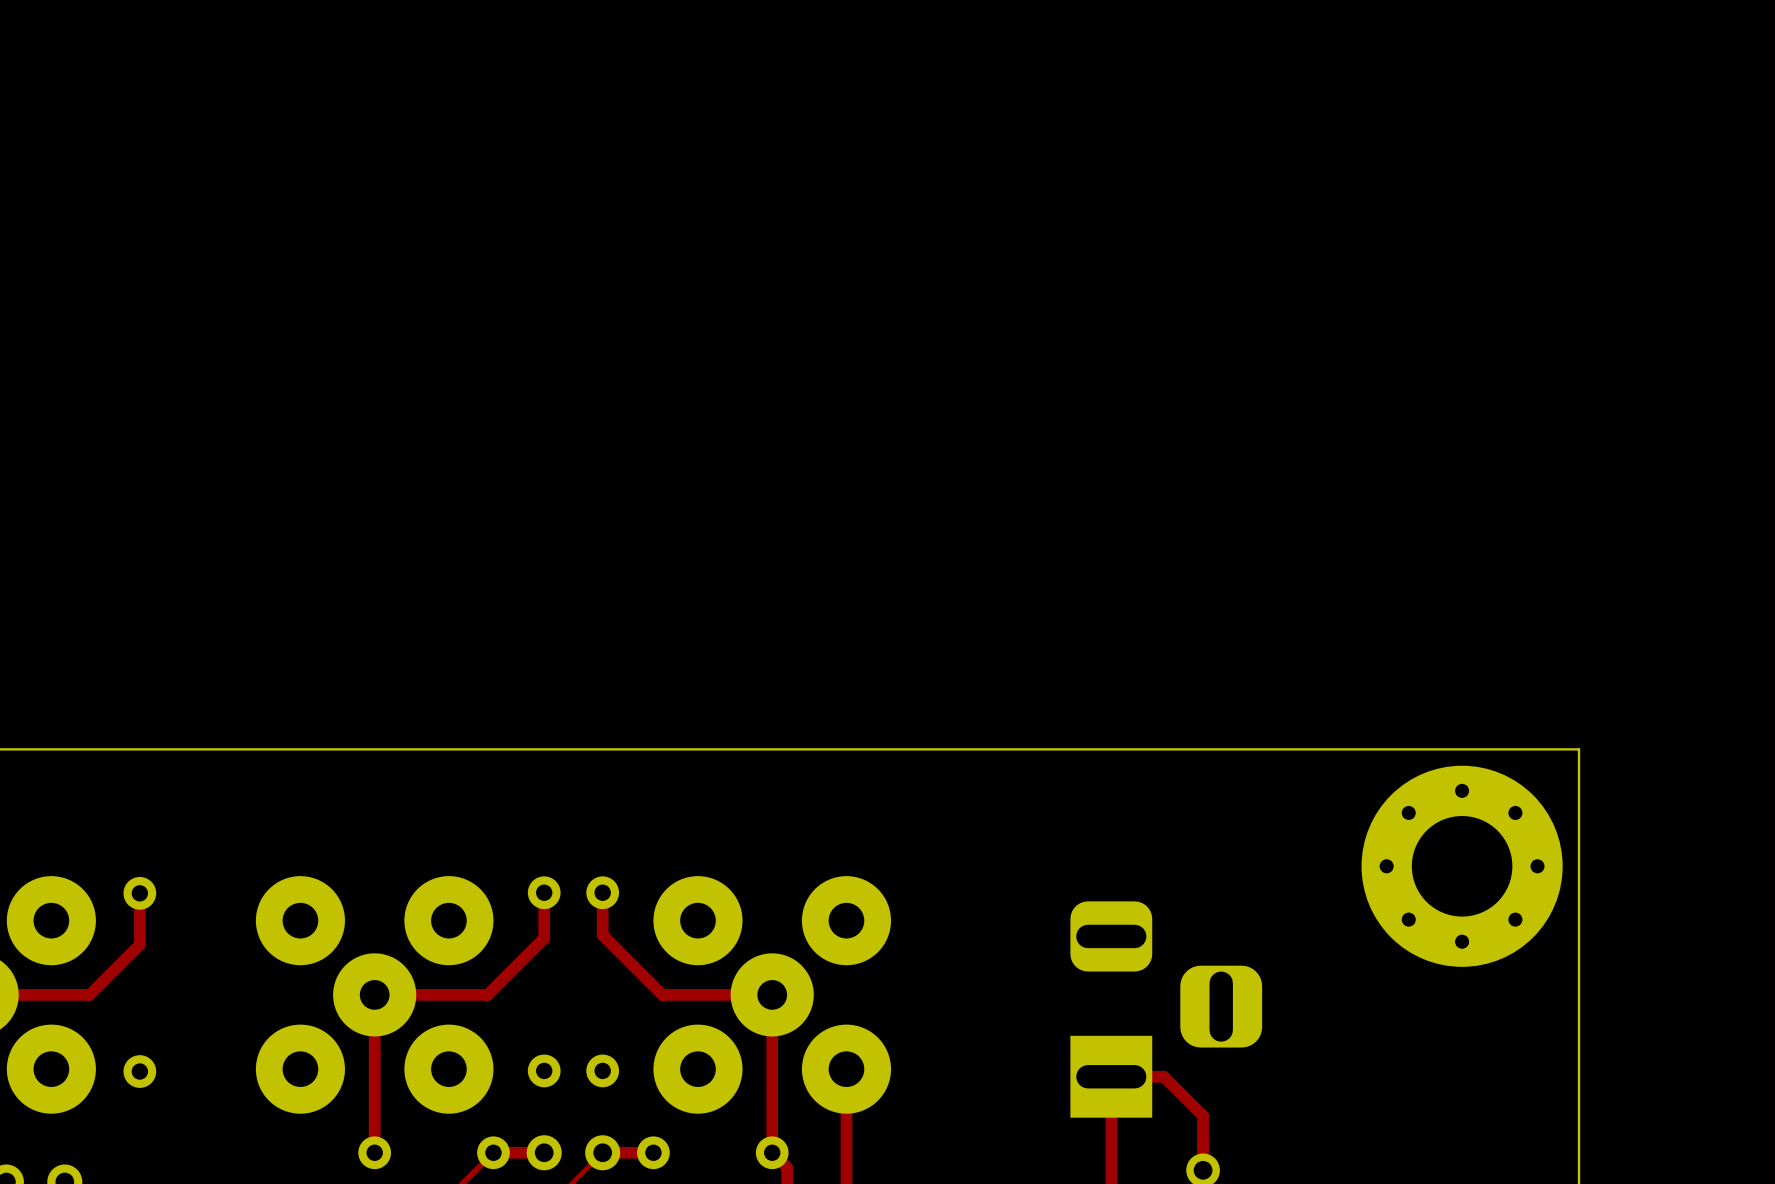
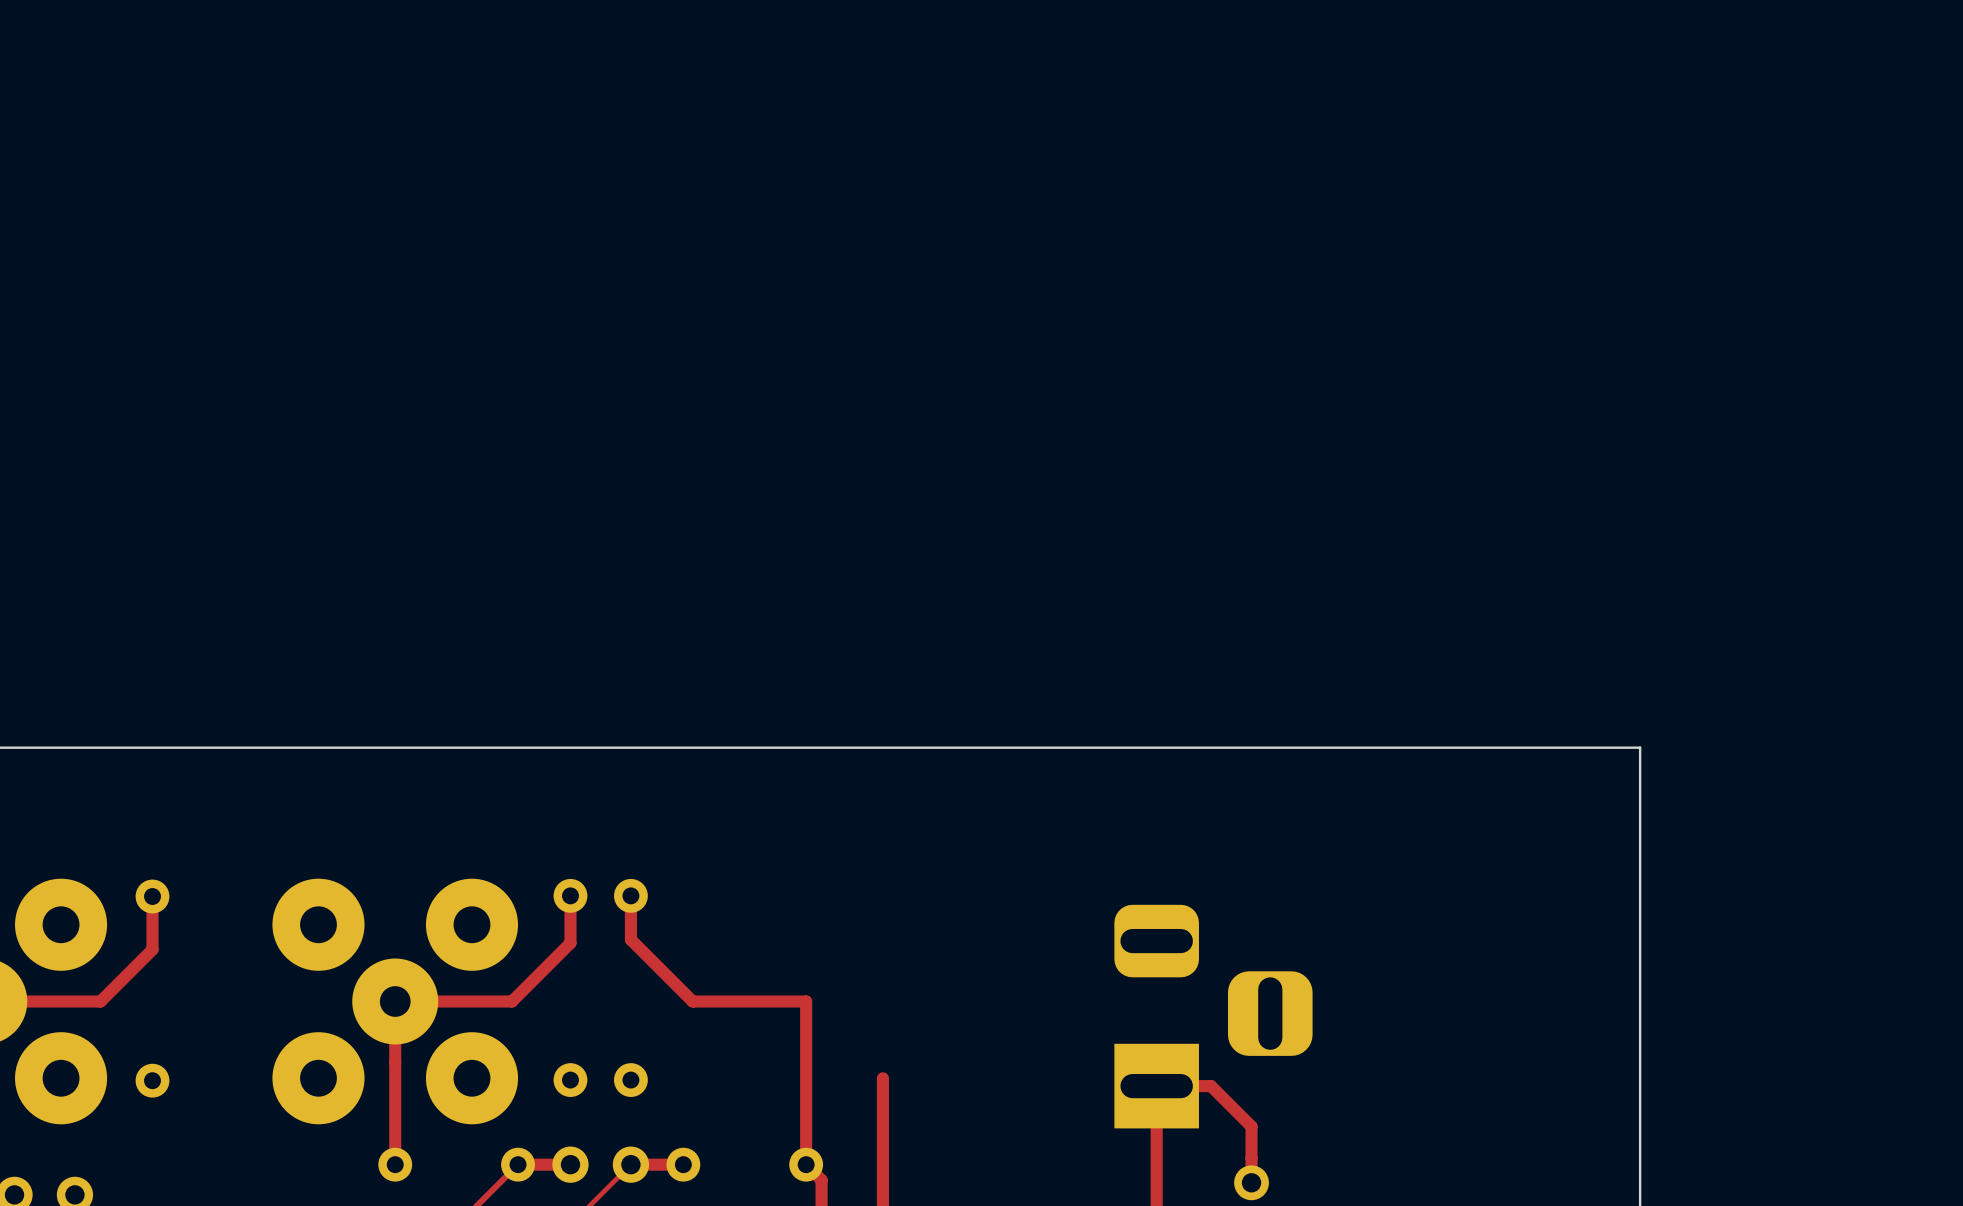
part: (1462, 866) -> none
part: (772, 994) -> none

